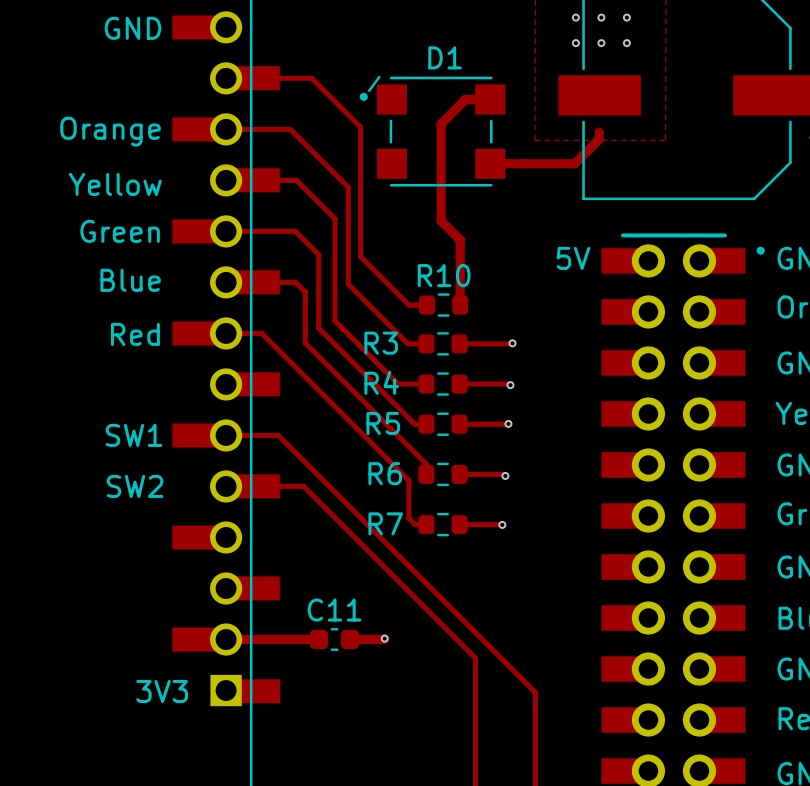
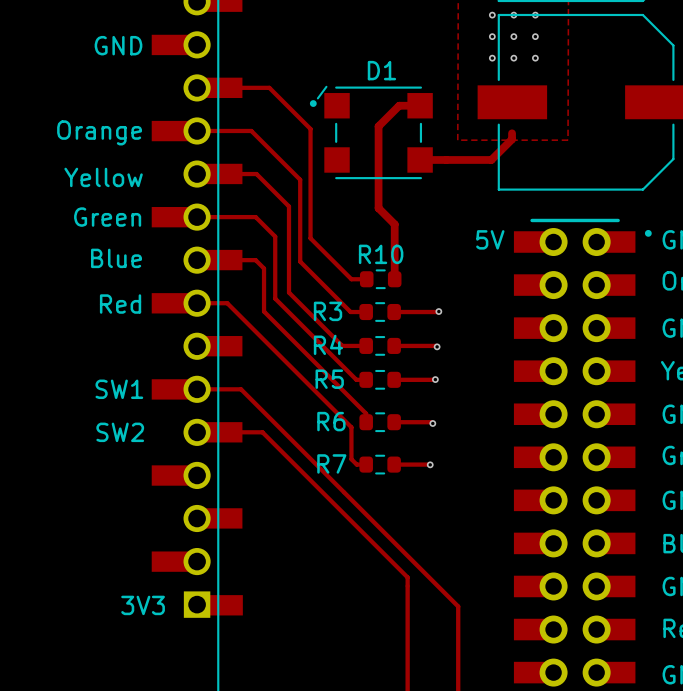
track: (384, 638) (350, 639) -> none
via: (384, 638) -> none
track: (226, 639) (318, 639) -> none
C11: (334, 639) -> none

